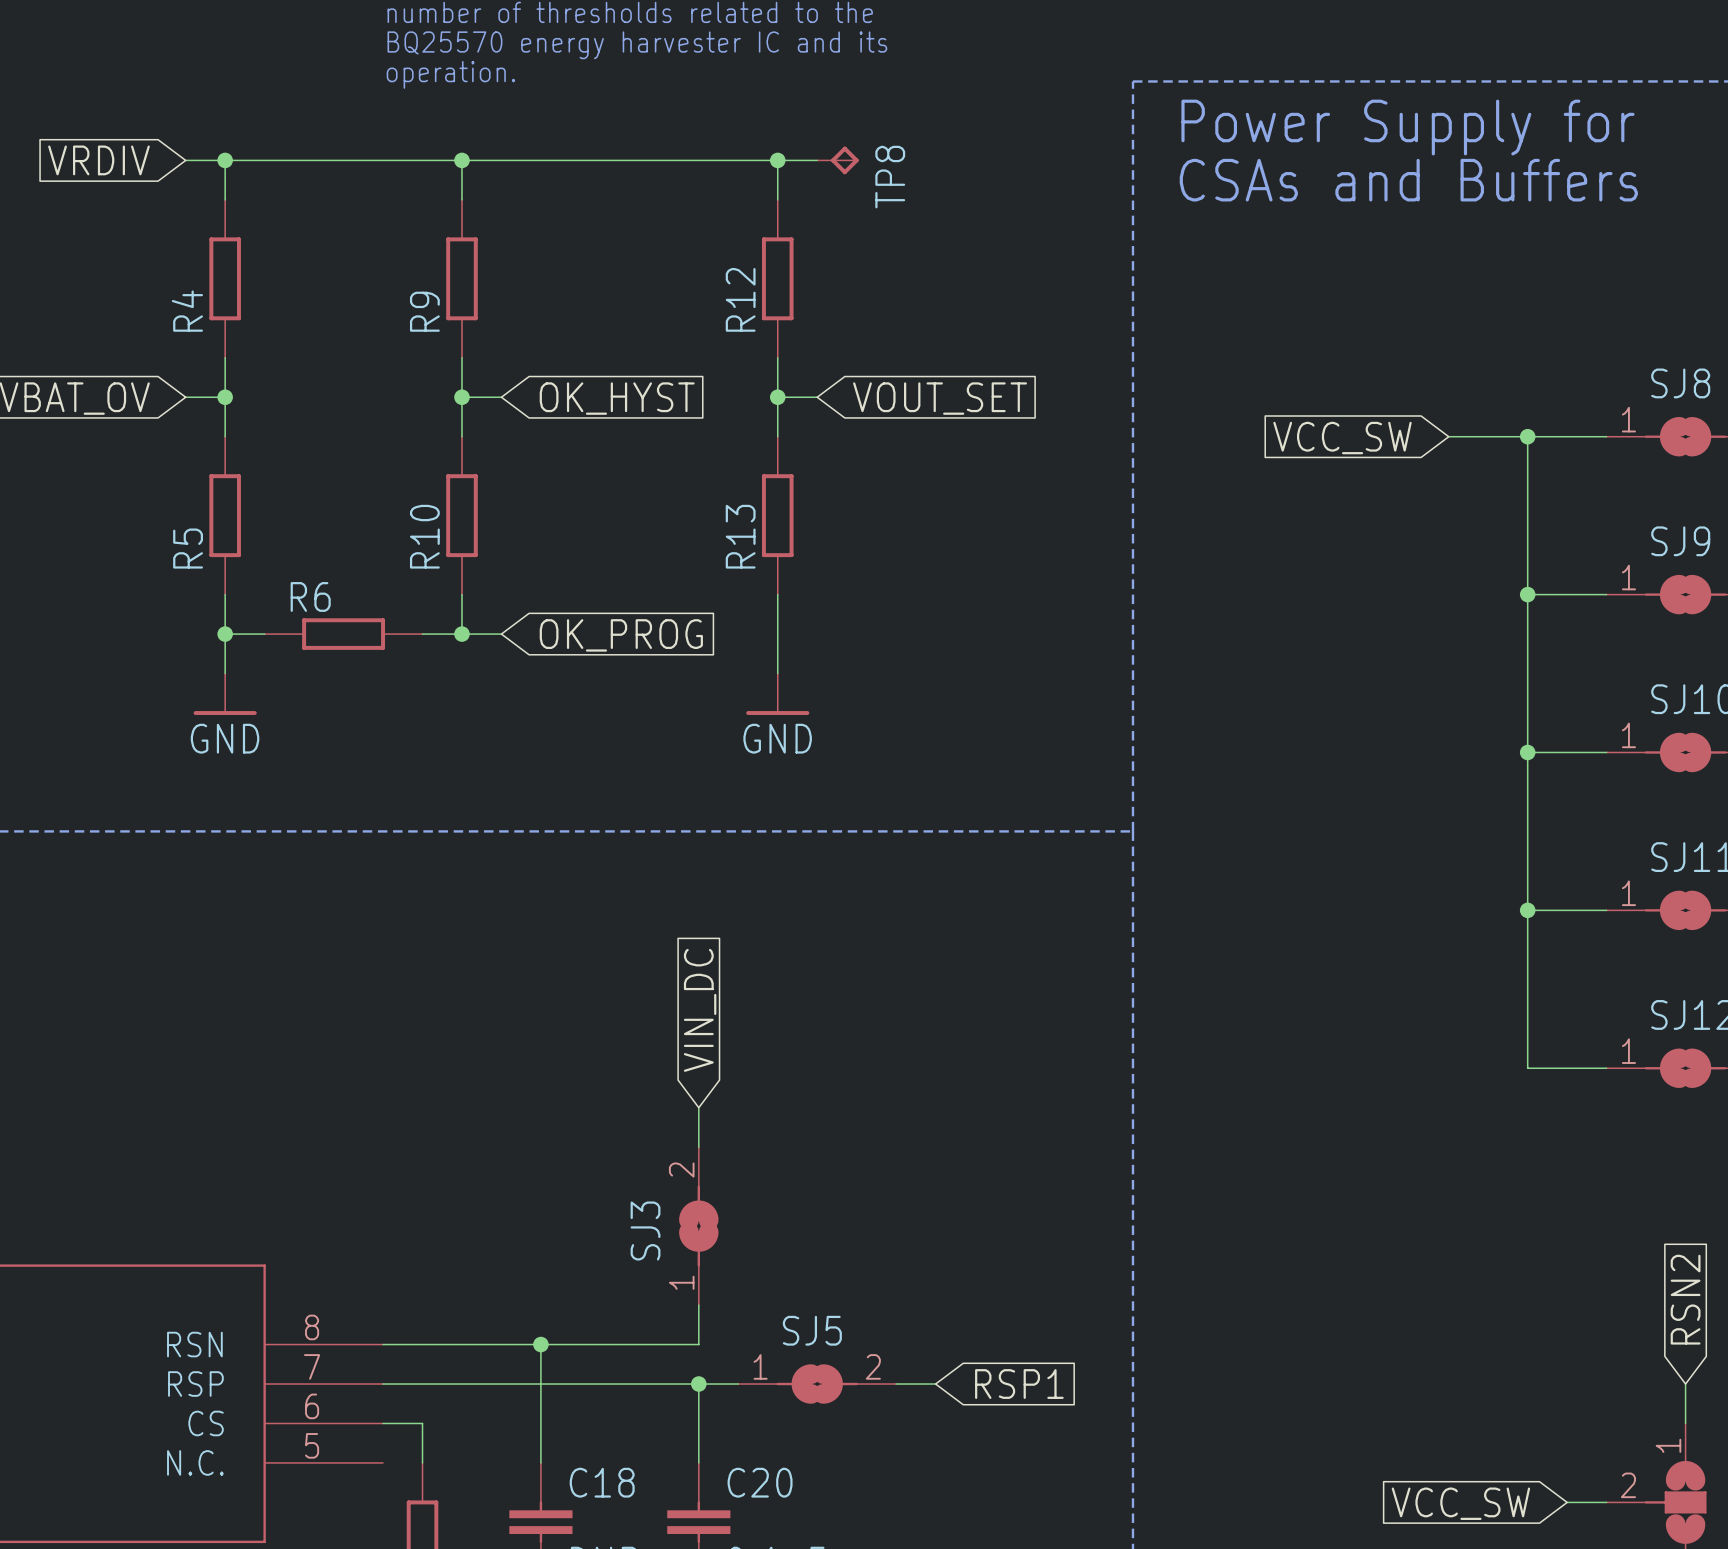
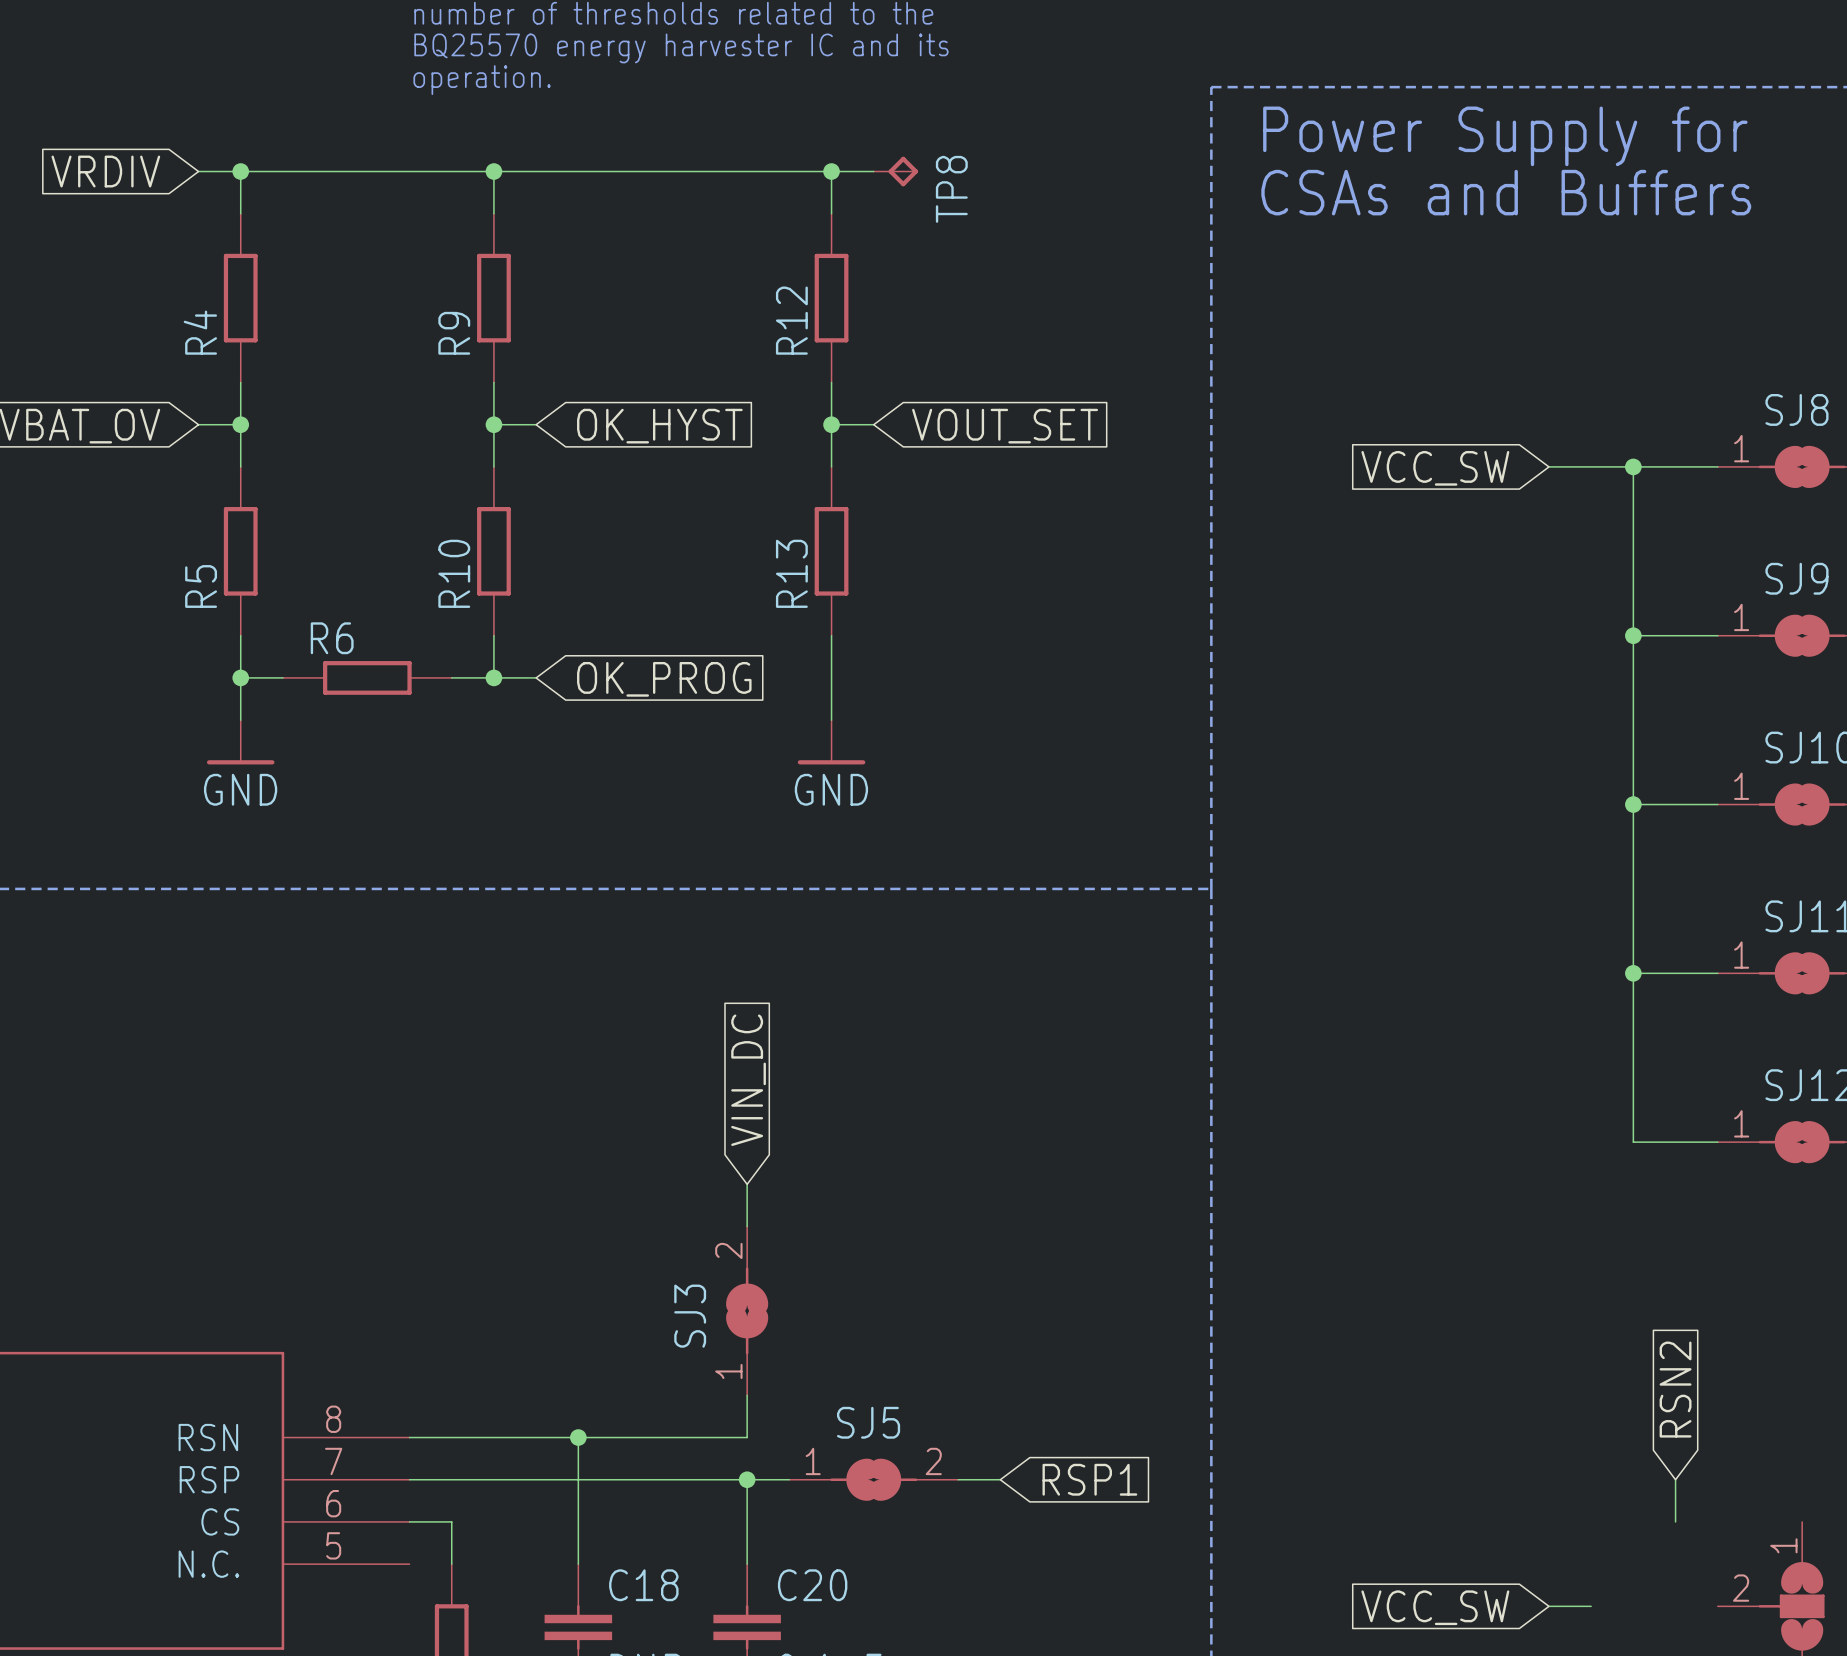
global label position: RSN2 (1685, 1299) -> RSN2 (1675, 1389)
wire: (1685, 1384) (1685, 1423) -> (1675, 1479) (1675, 1521)
wire: (1567, 1502) (1606, 1502) -> (1548, 1606) (1591, 1606)
global label position: VCC_SW (1460, 1503) -> VCC_SW (1435, 1607)

